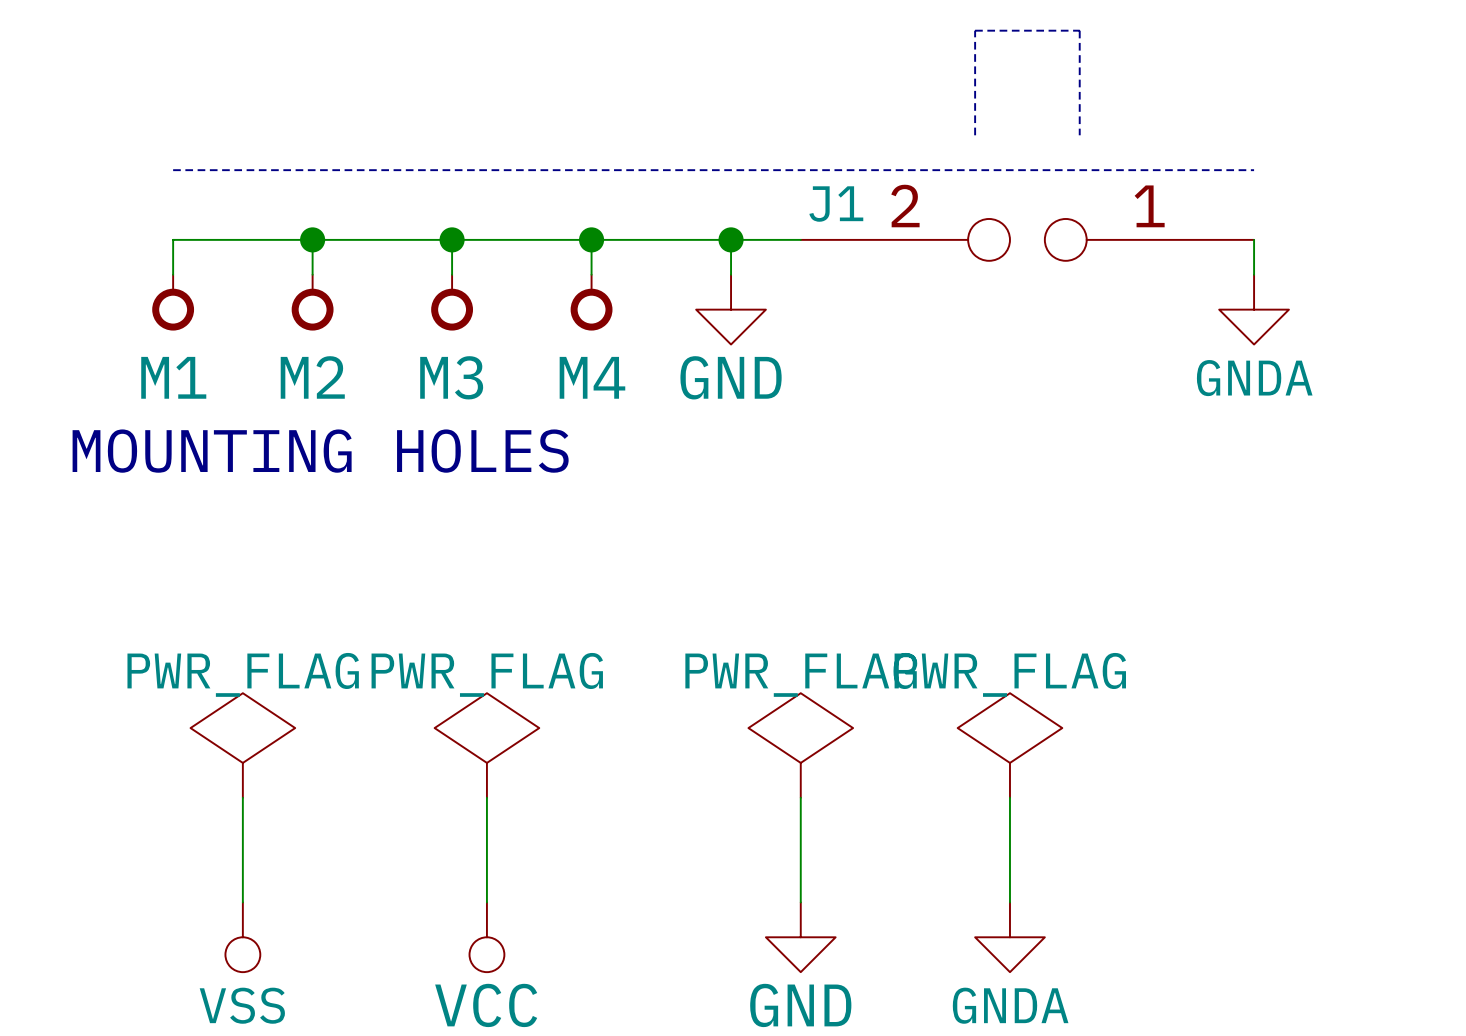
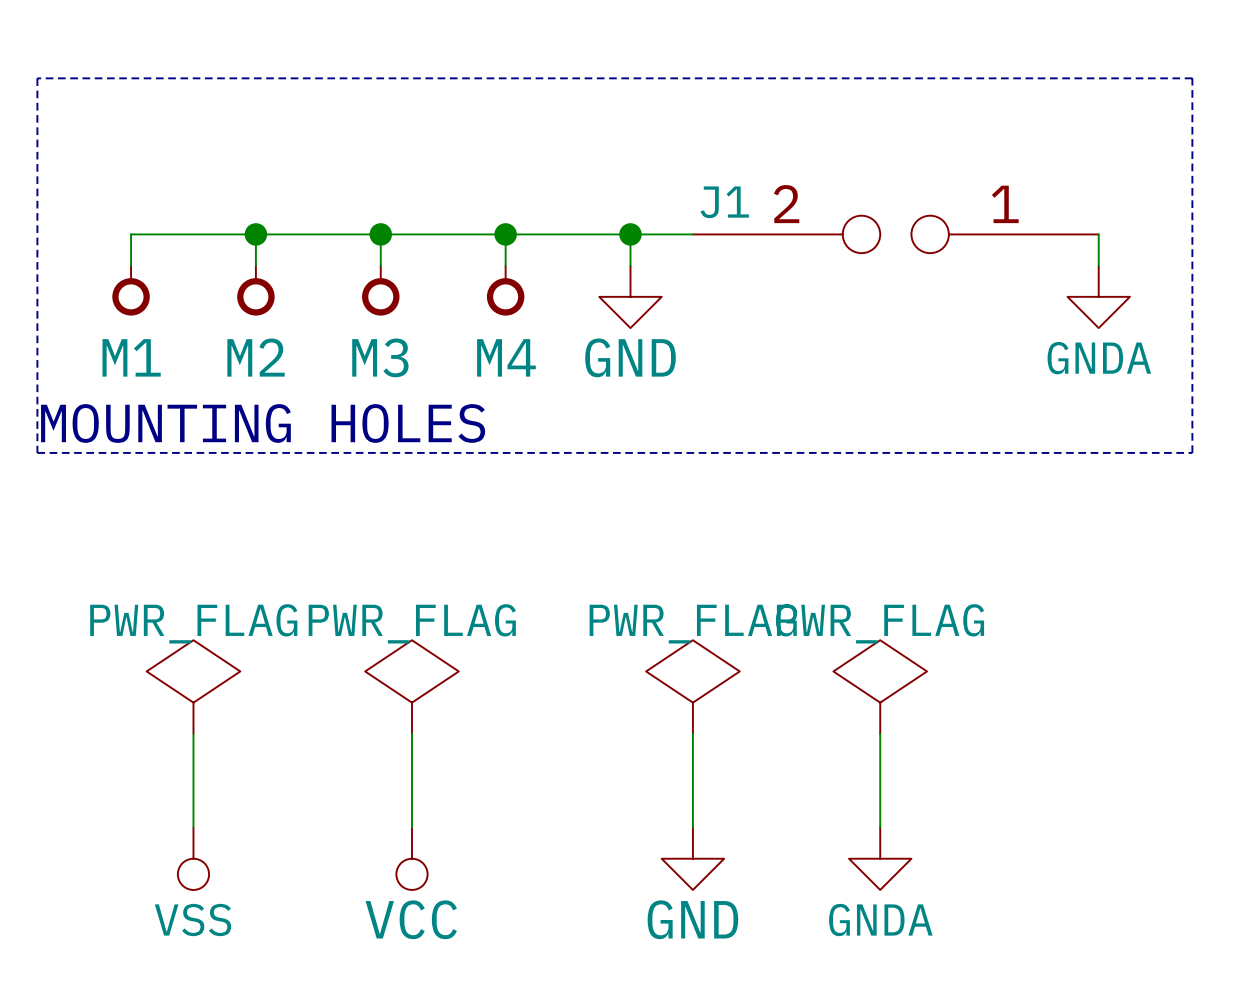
line: none -> (37, 78) (1192, 78) (1192, 452) (37, 452) (37, 78)
line: (975, 135) (975, 30) (1079, 30) (1079, 135) -> none
line: (173, 170) (1254, 170) -> none

